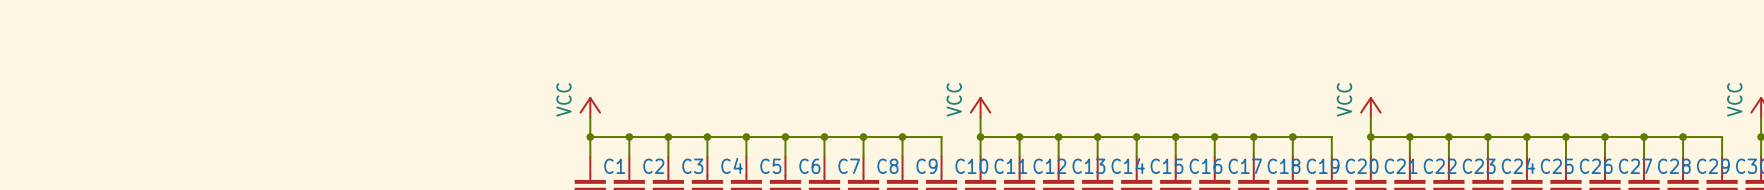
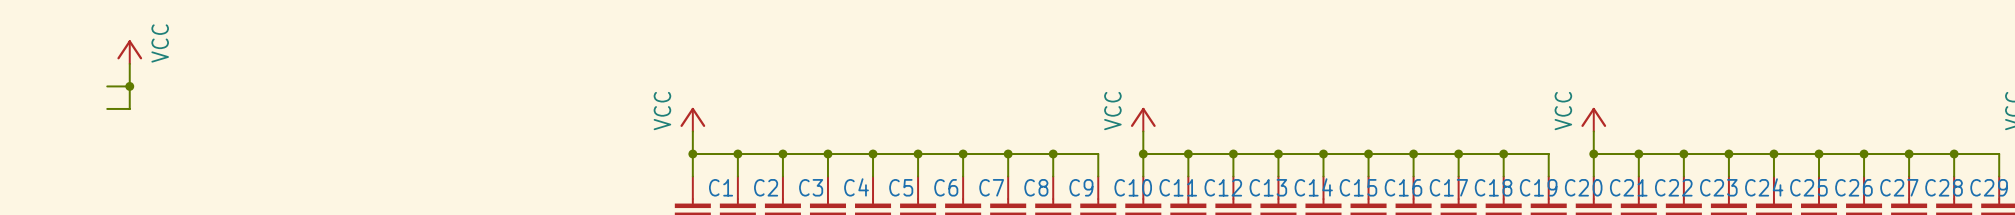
power symbol: none -> VCC (129, 52)
wire: none -> (129, 63) (129, 108) (107, 108)
wire: none -> (107, 86) (129, 86)
junction: none -> (129, 86)

